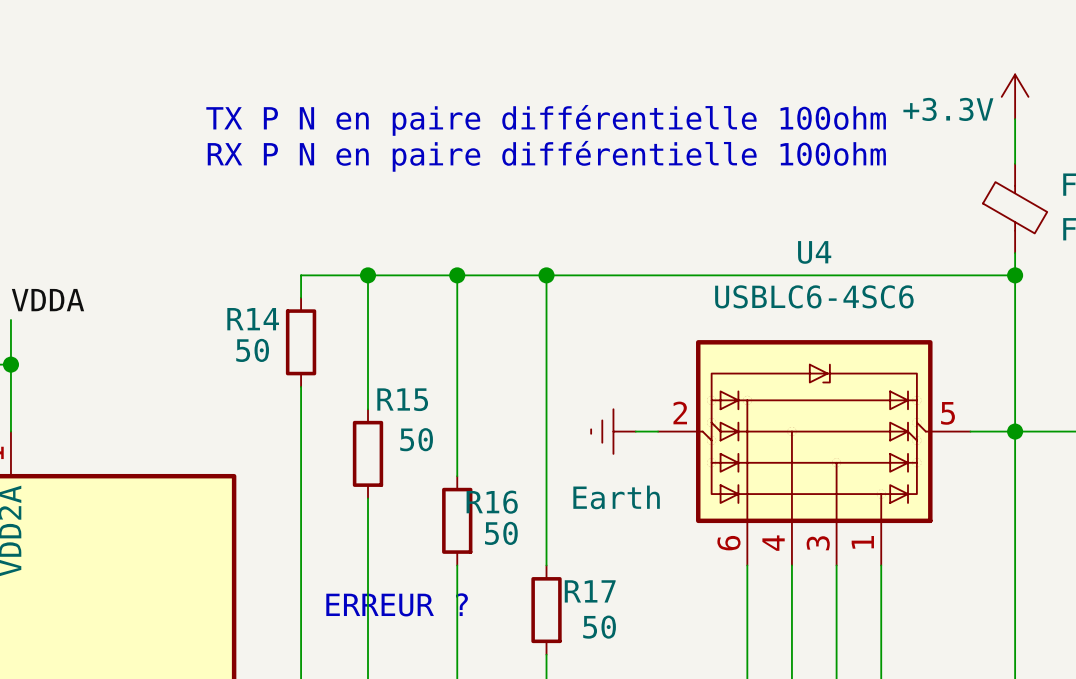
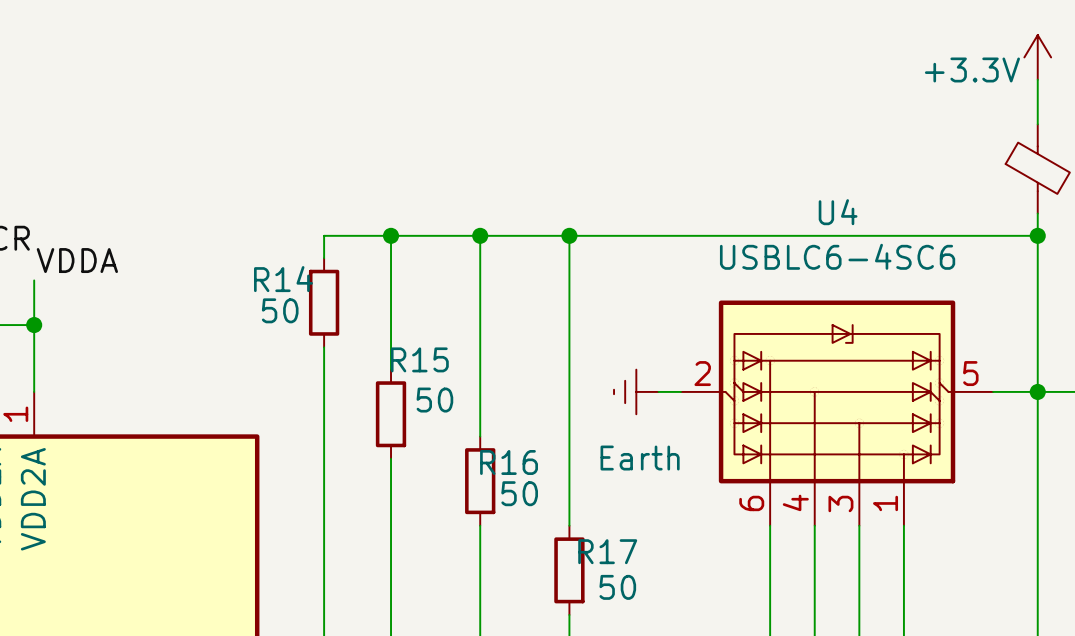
text: TX P N en paire différentielle 100ohm (546, 120) -> none
text: RX P N en paire différentielle 100ohm (546, 156) -> none
text: ERREUR ? (397, 604) -> none

